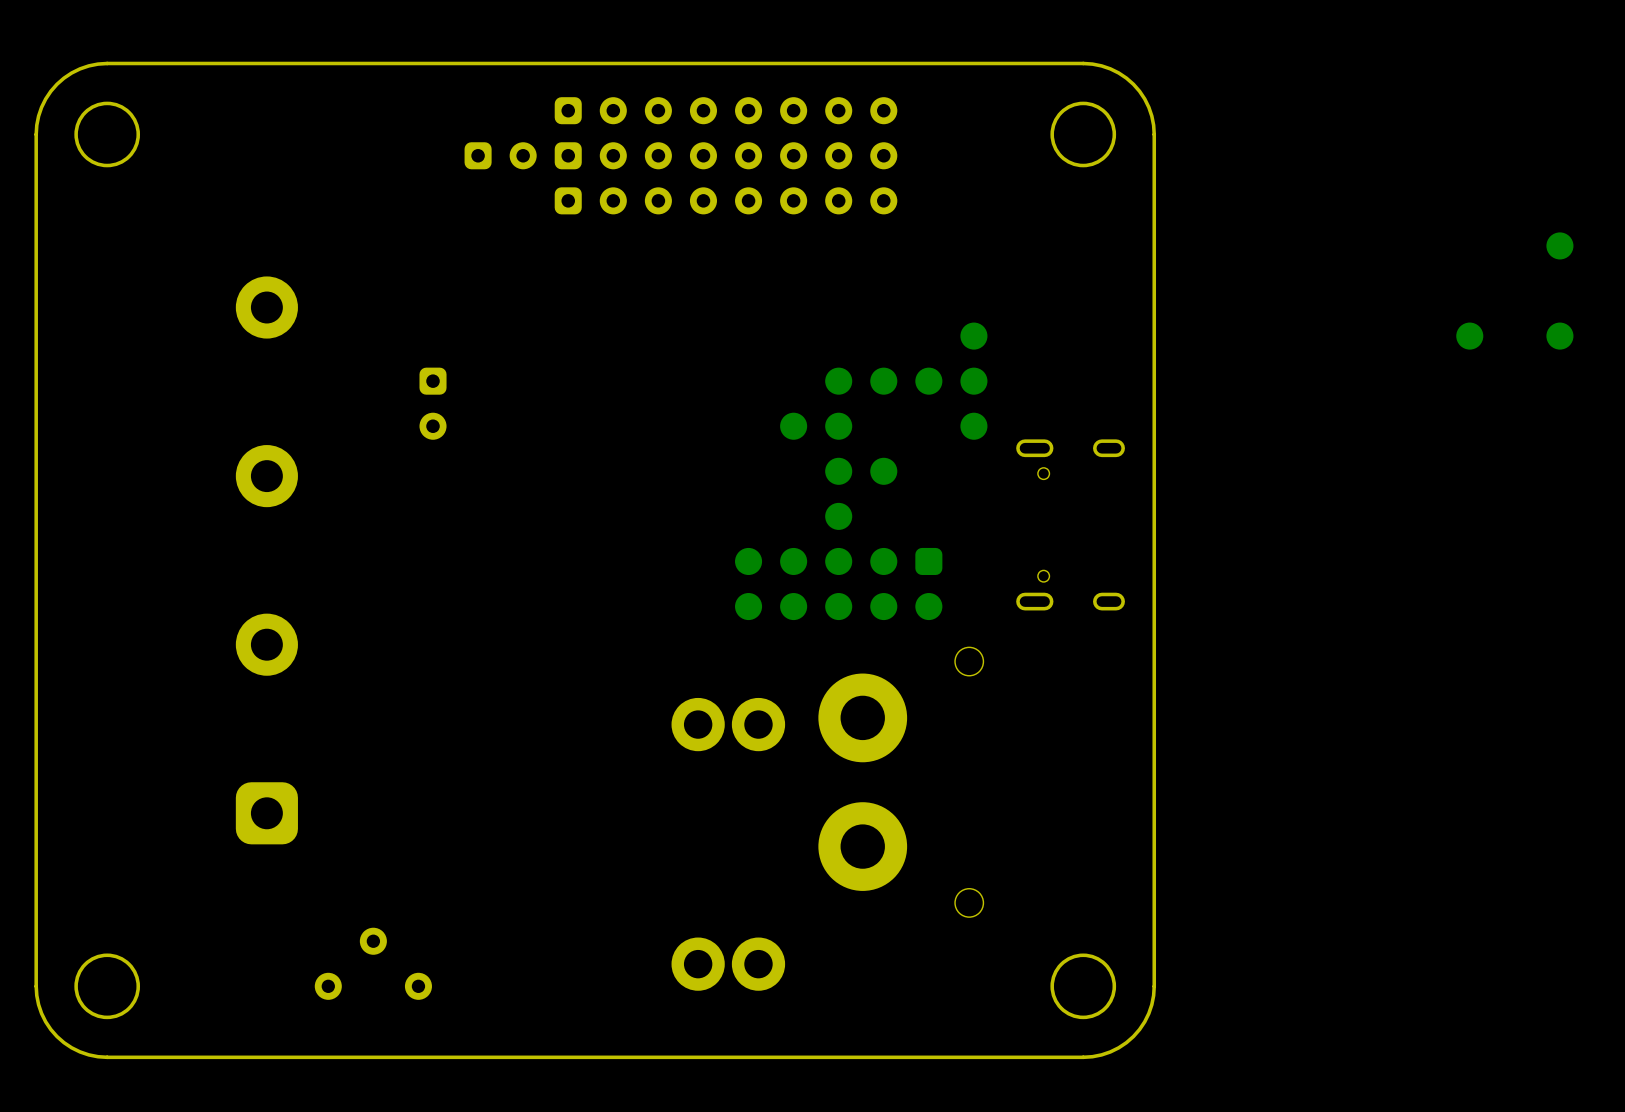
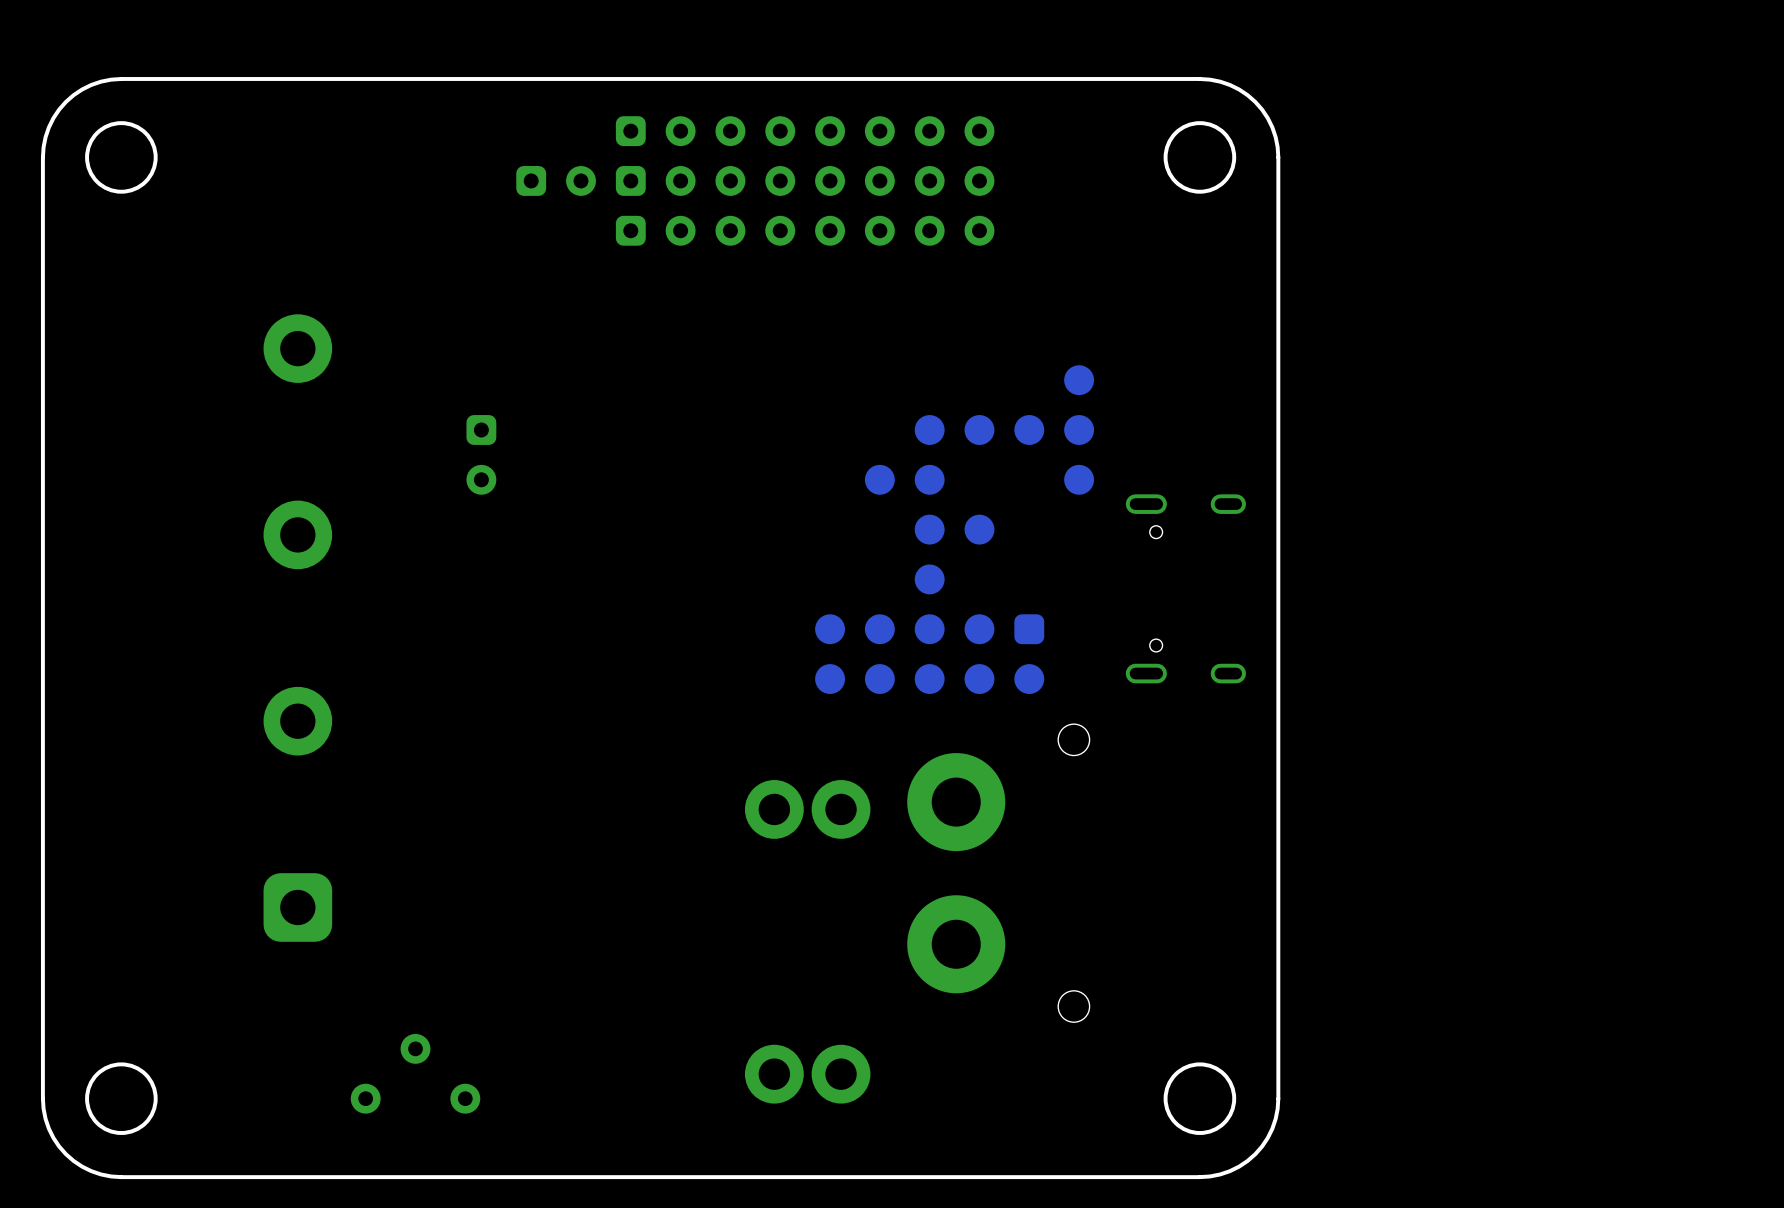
part: (1559, 245) -> none
part: (1469, 336) -> none
part: (1559, 336) -> none

